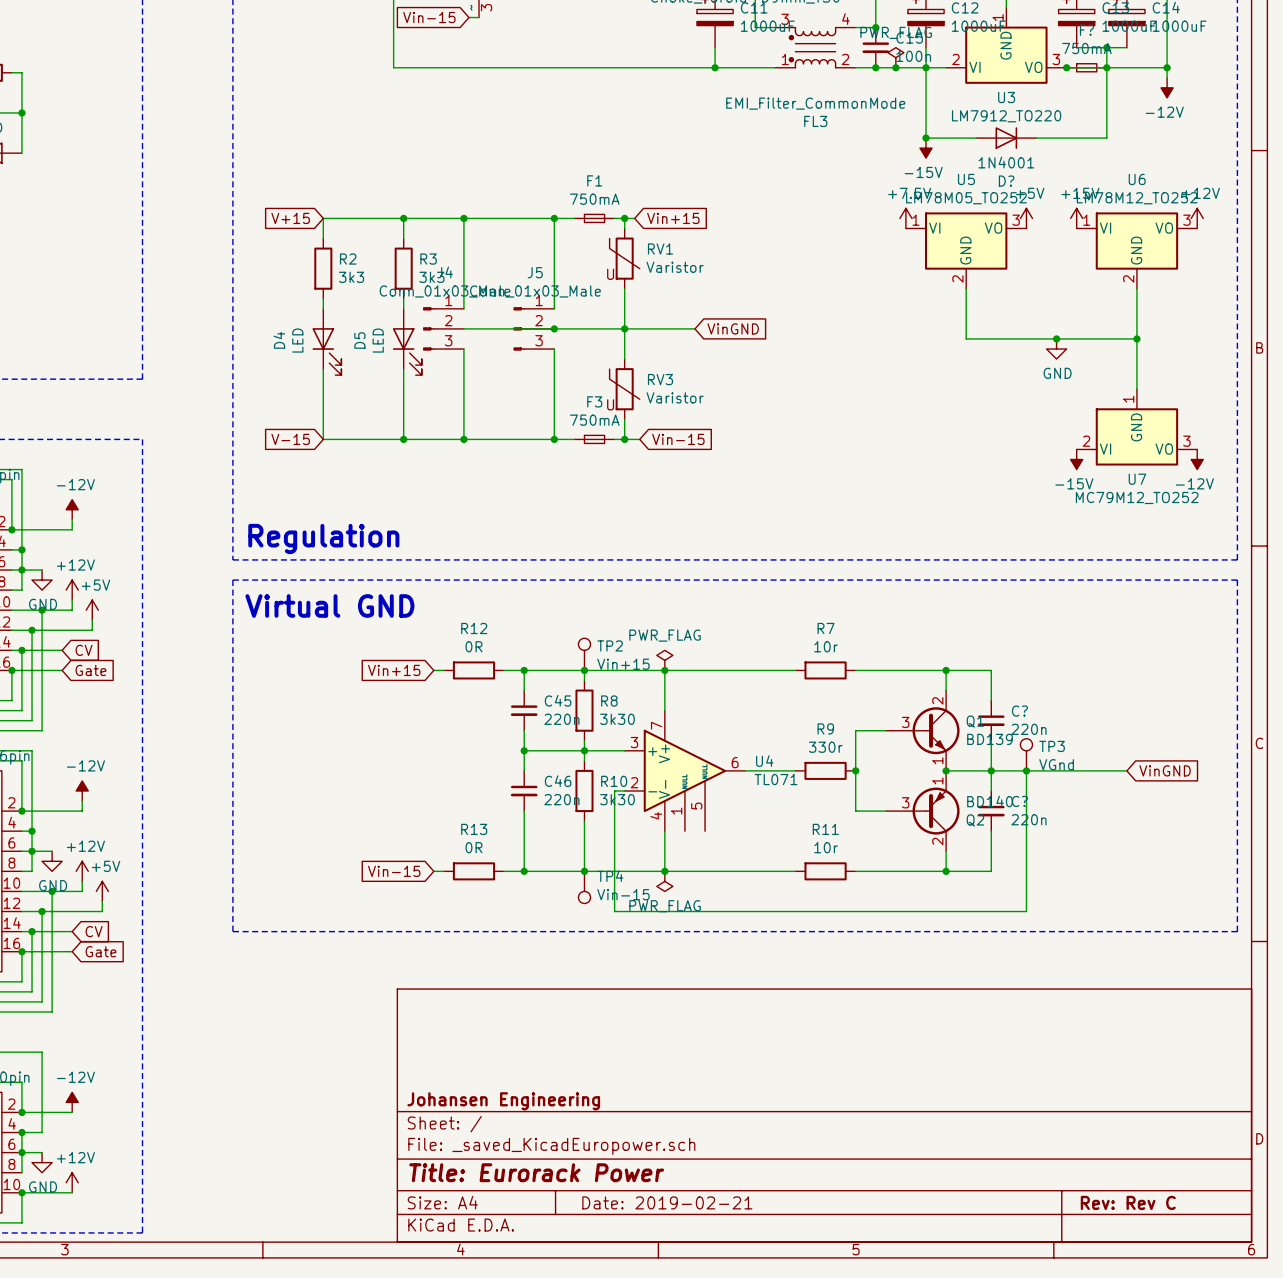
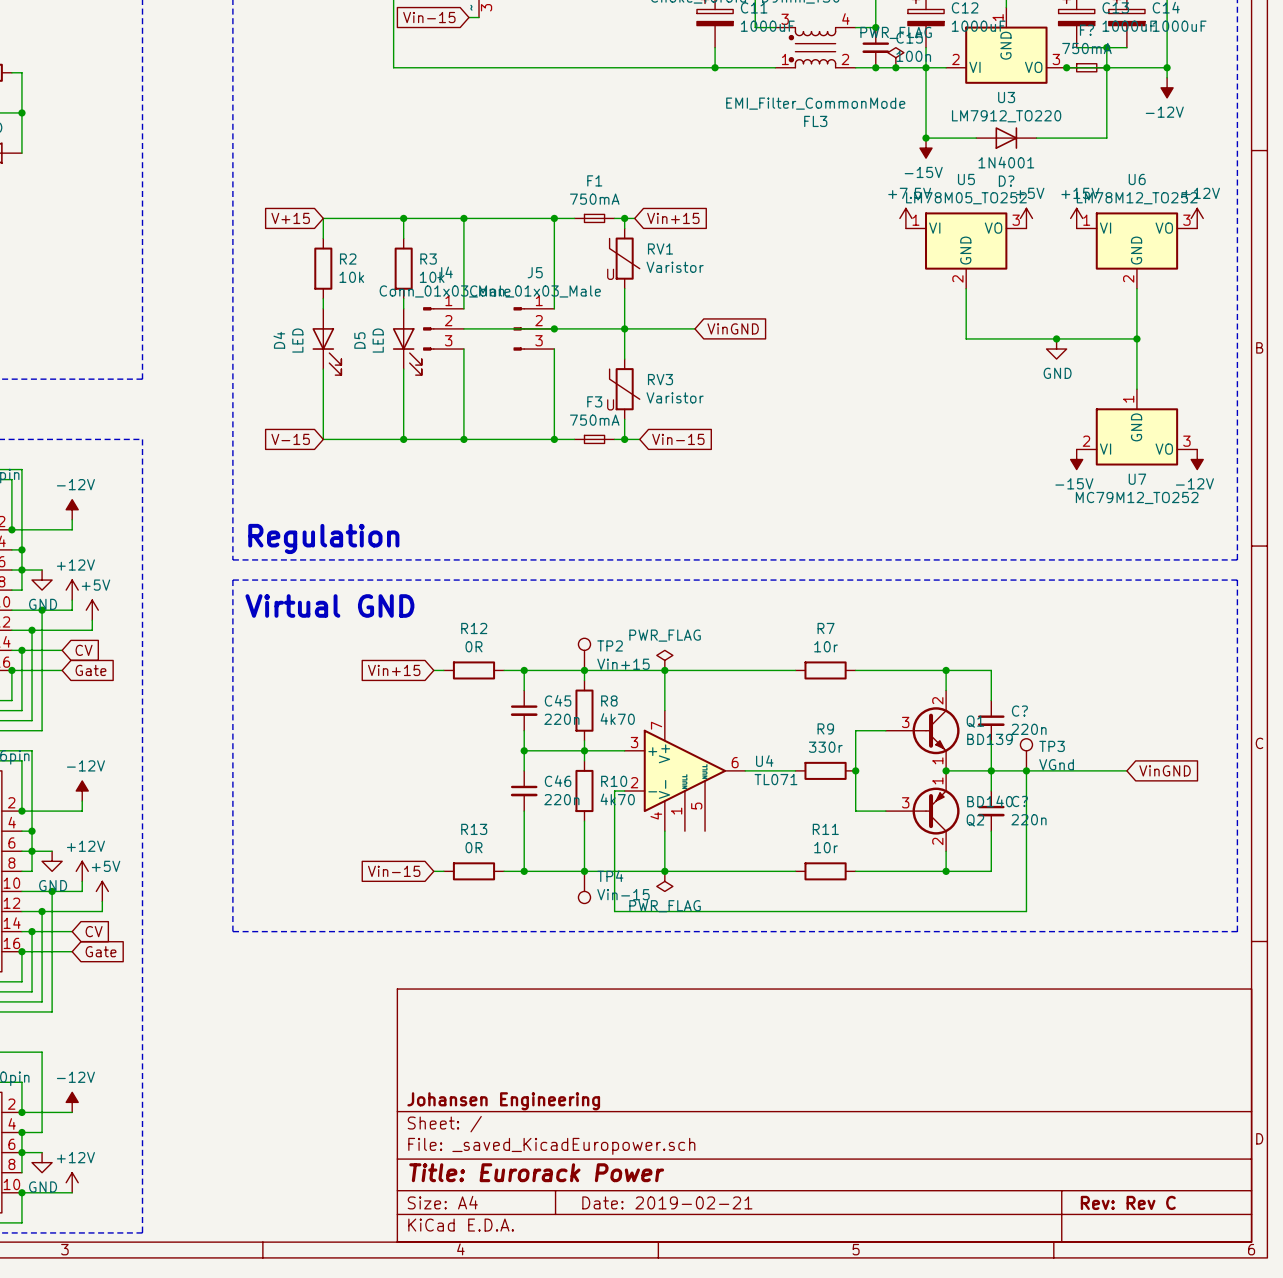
R2 value: 3k3 (351, 277) -> 10k (351, 277)
R3 value: 3k3 (431, 277) -> 10k (432, 277)
R8 value: 3k30 (617, 719) -> 4k70 (617, 719)
R10 value: 3k30 (617, 799) -> 4k70 (617, 799)

